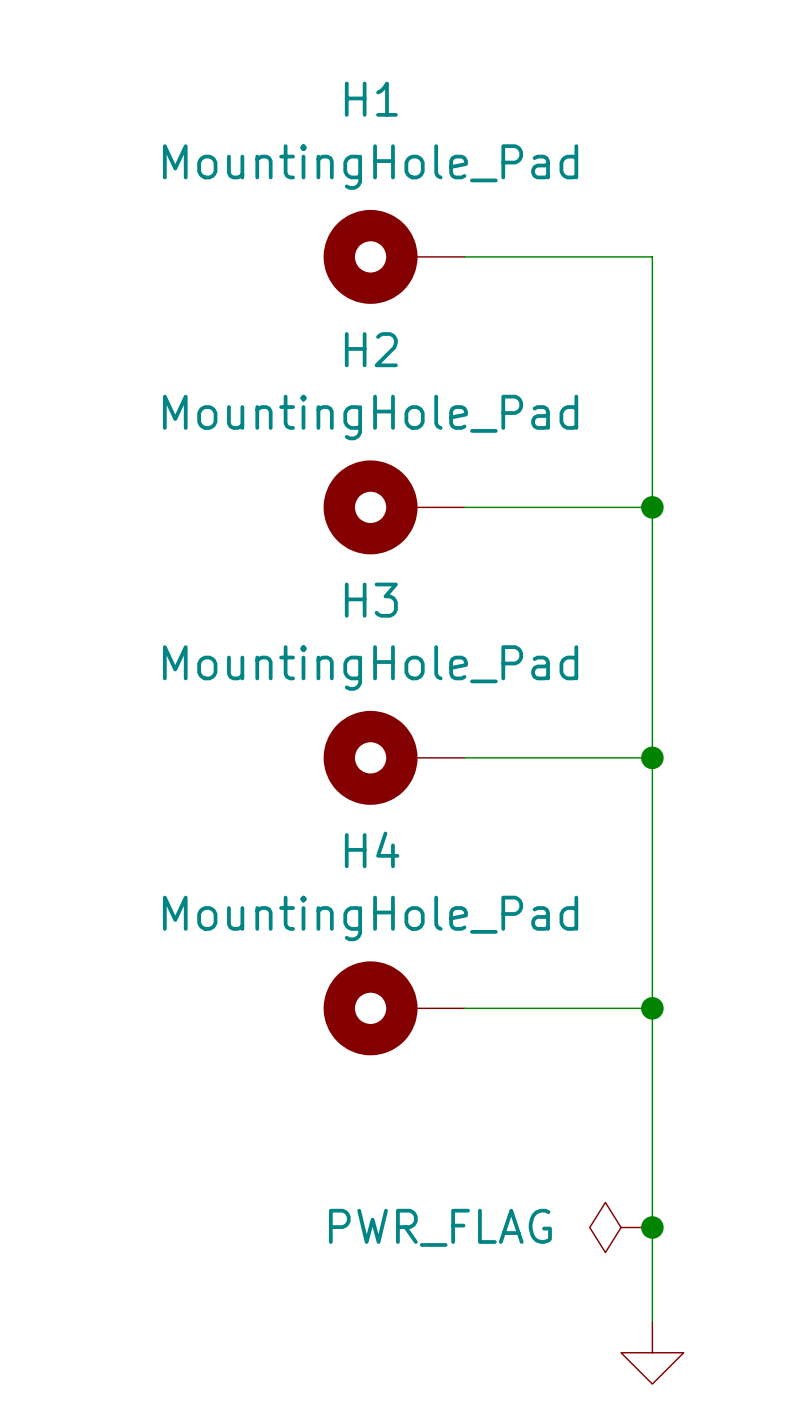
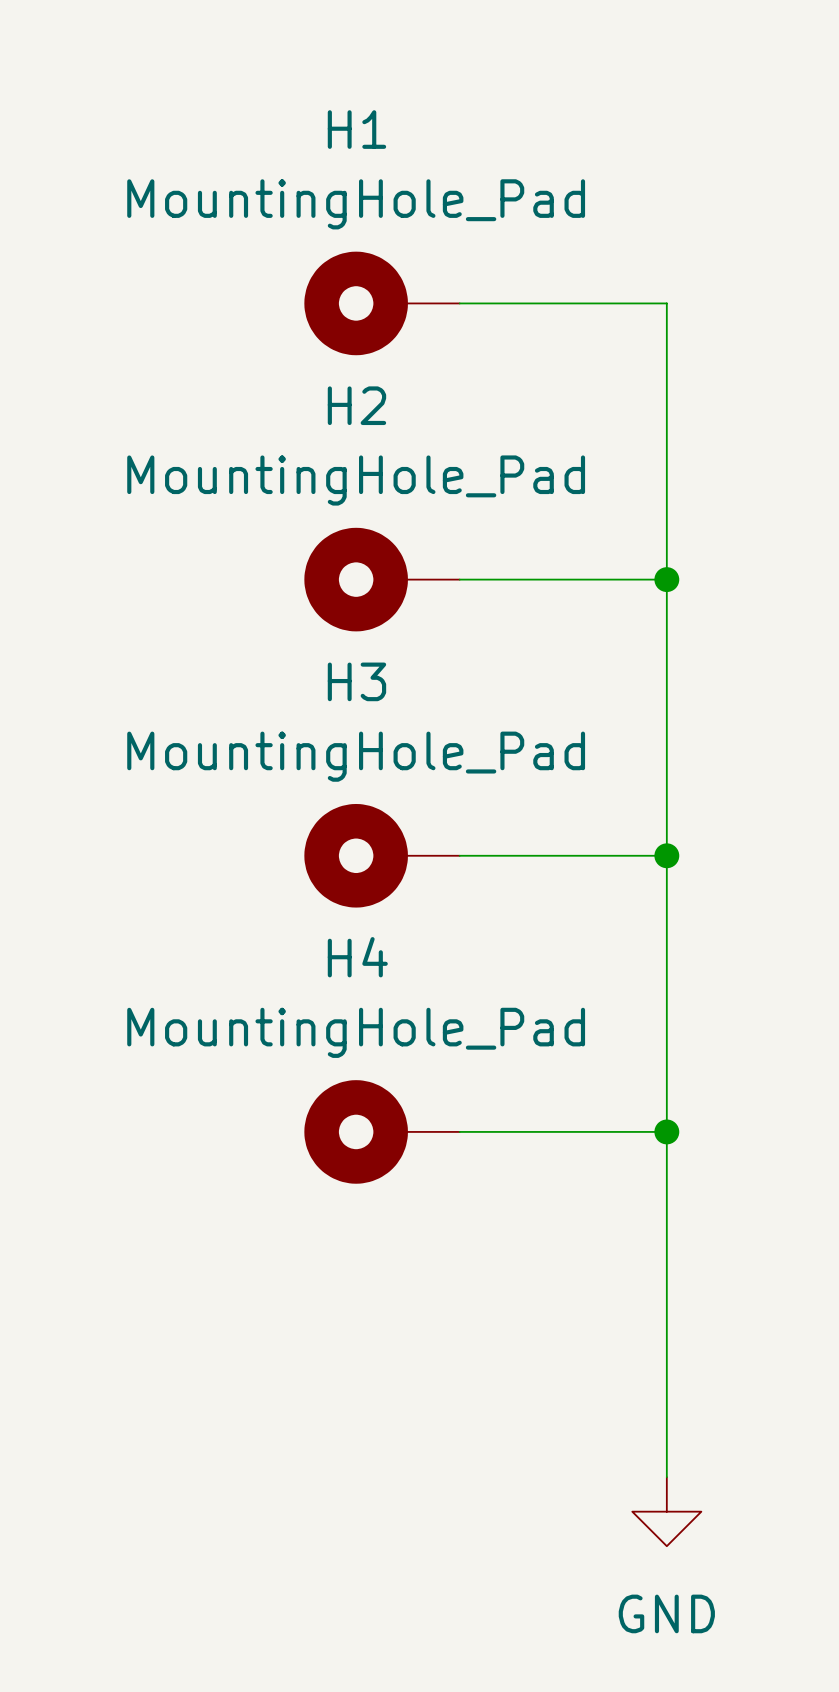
power symbol: PWR_FLAG (621, 1227) -> none
junction: (652, 1227) -> none

